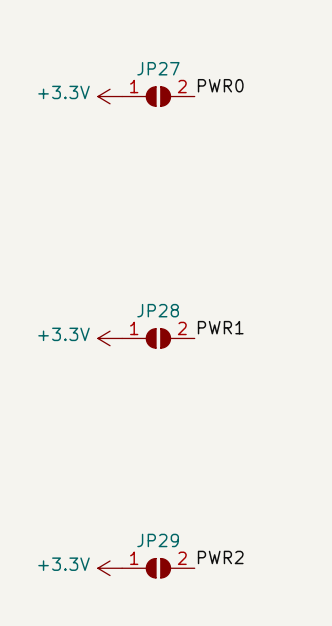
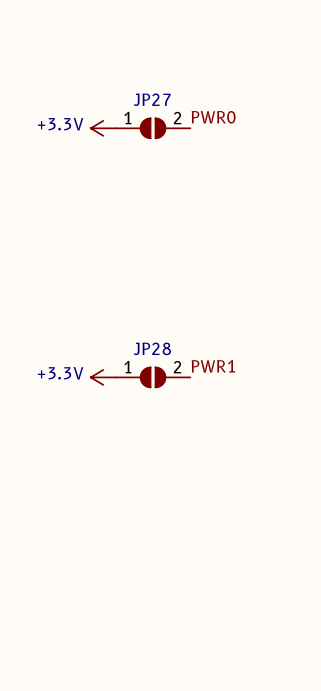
label: PWR2 (220, 557) -> none
power symbol: +3.3V (110, 568) -> none
JP29: (158, 568) -> none

